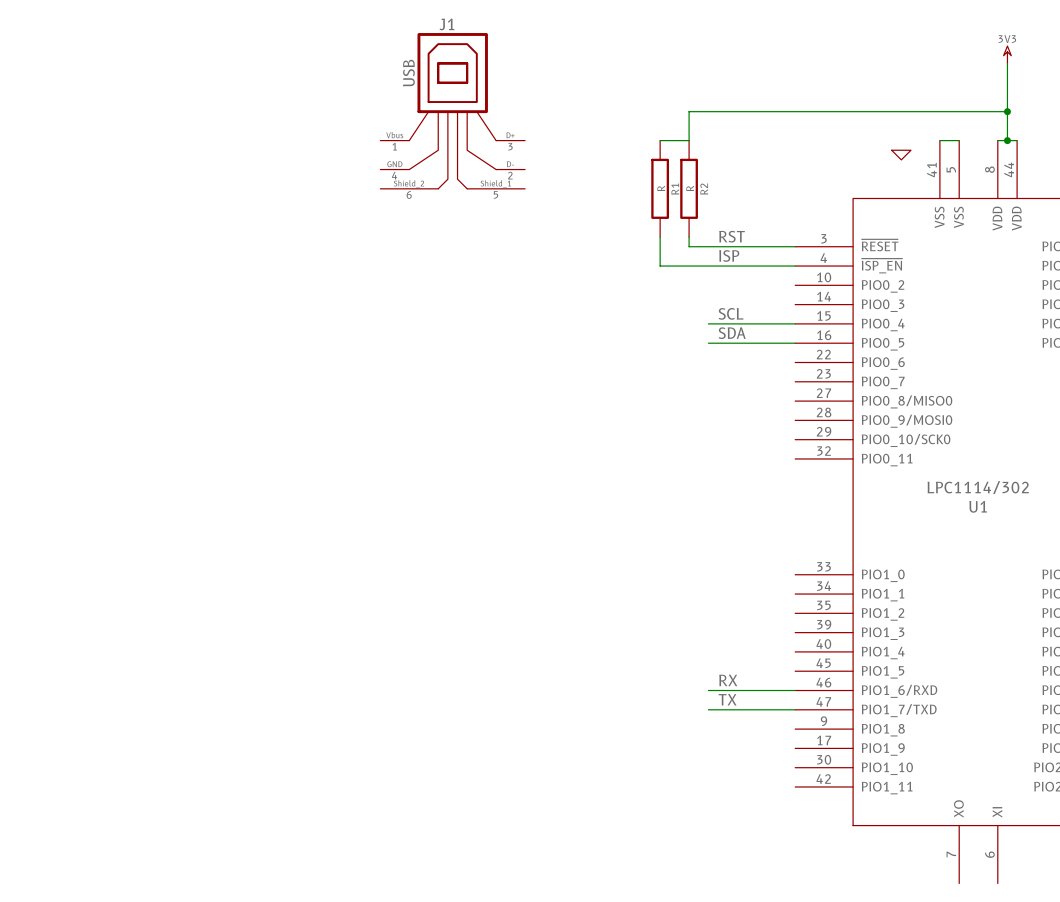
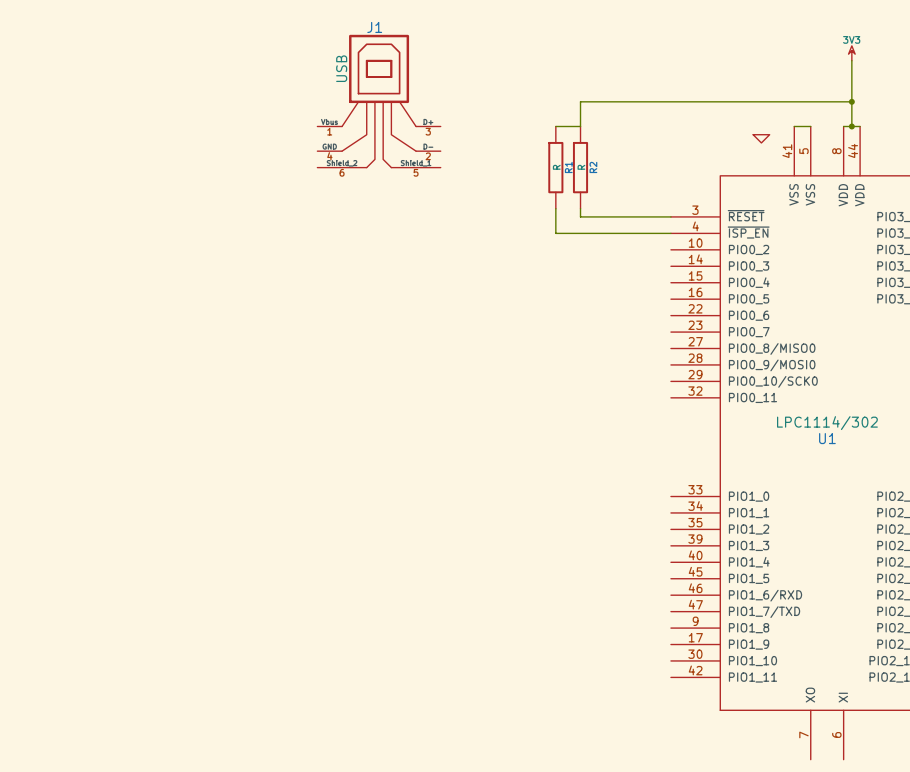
label: RST (731, 236) -> none
label: ISP (729, 255) -> none
label: SCL (731, 313) -> none
wire: (708, 323) (795, 323) -> none
label: SDA (732, 333) -> none
wire: (708, 343) (795, 343) -> none
label: RX (728, 680) -> none
wire: (708, 690) (795, 690) -> none
label: TX (727, 699) -> none
wire: (708, 709) (795, 709) -> none

